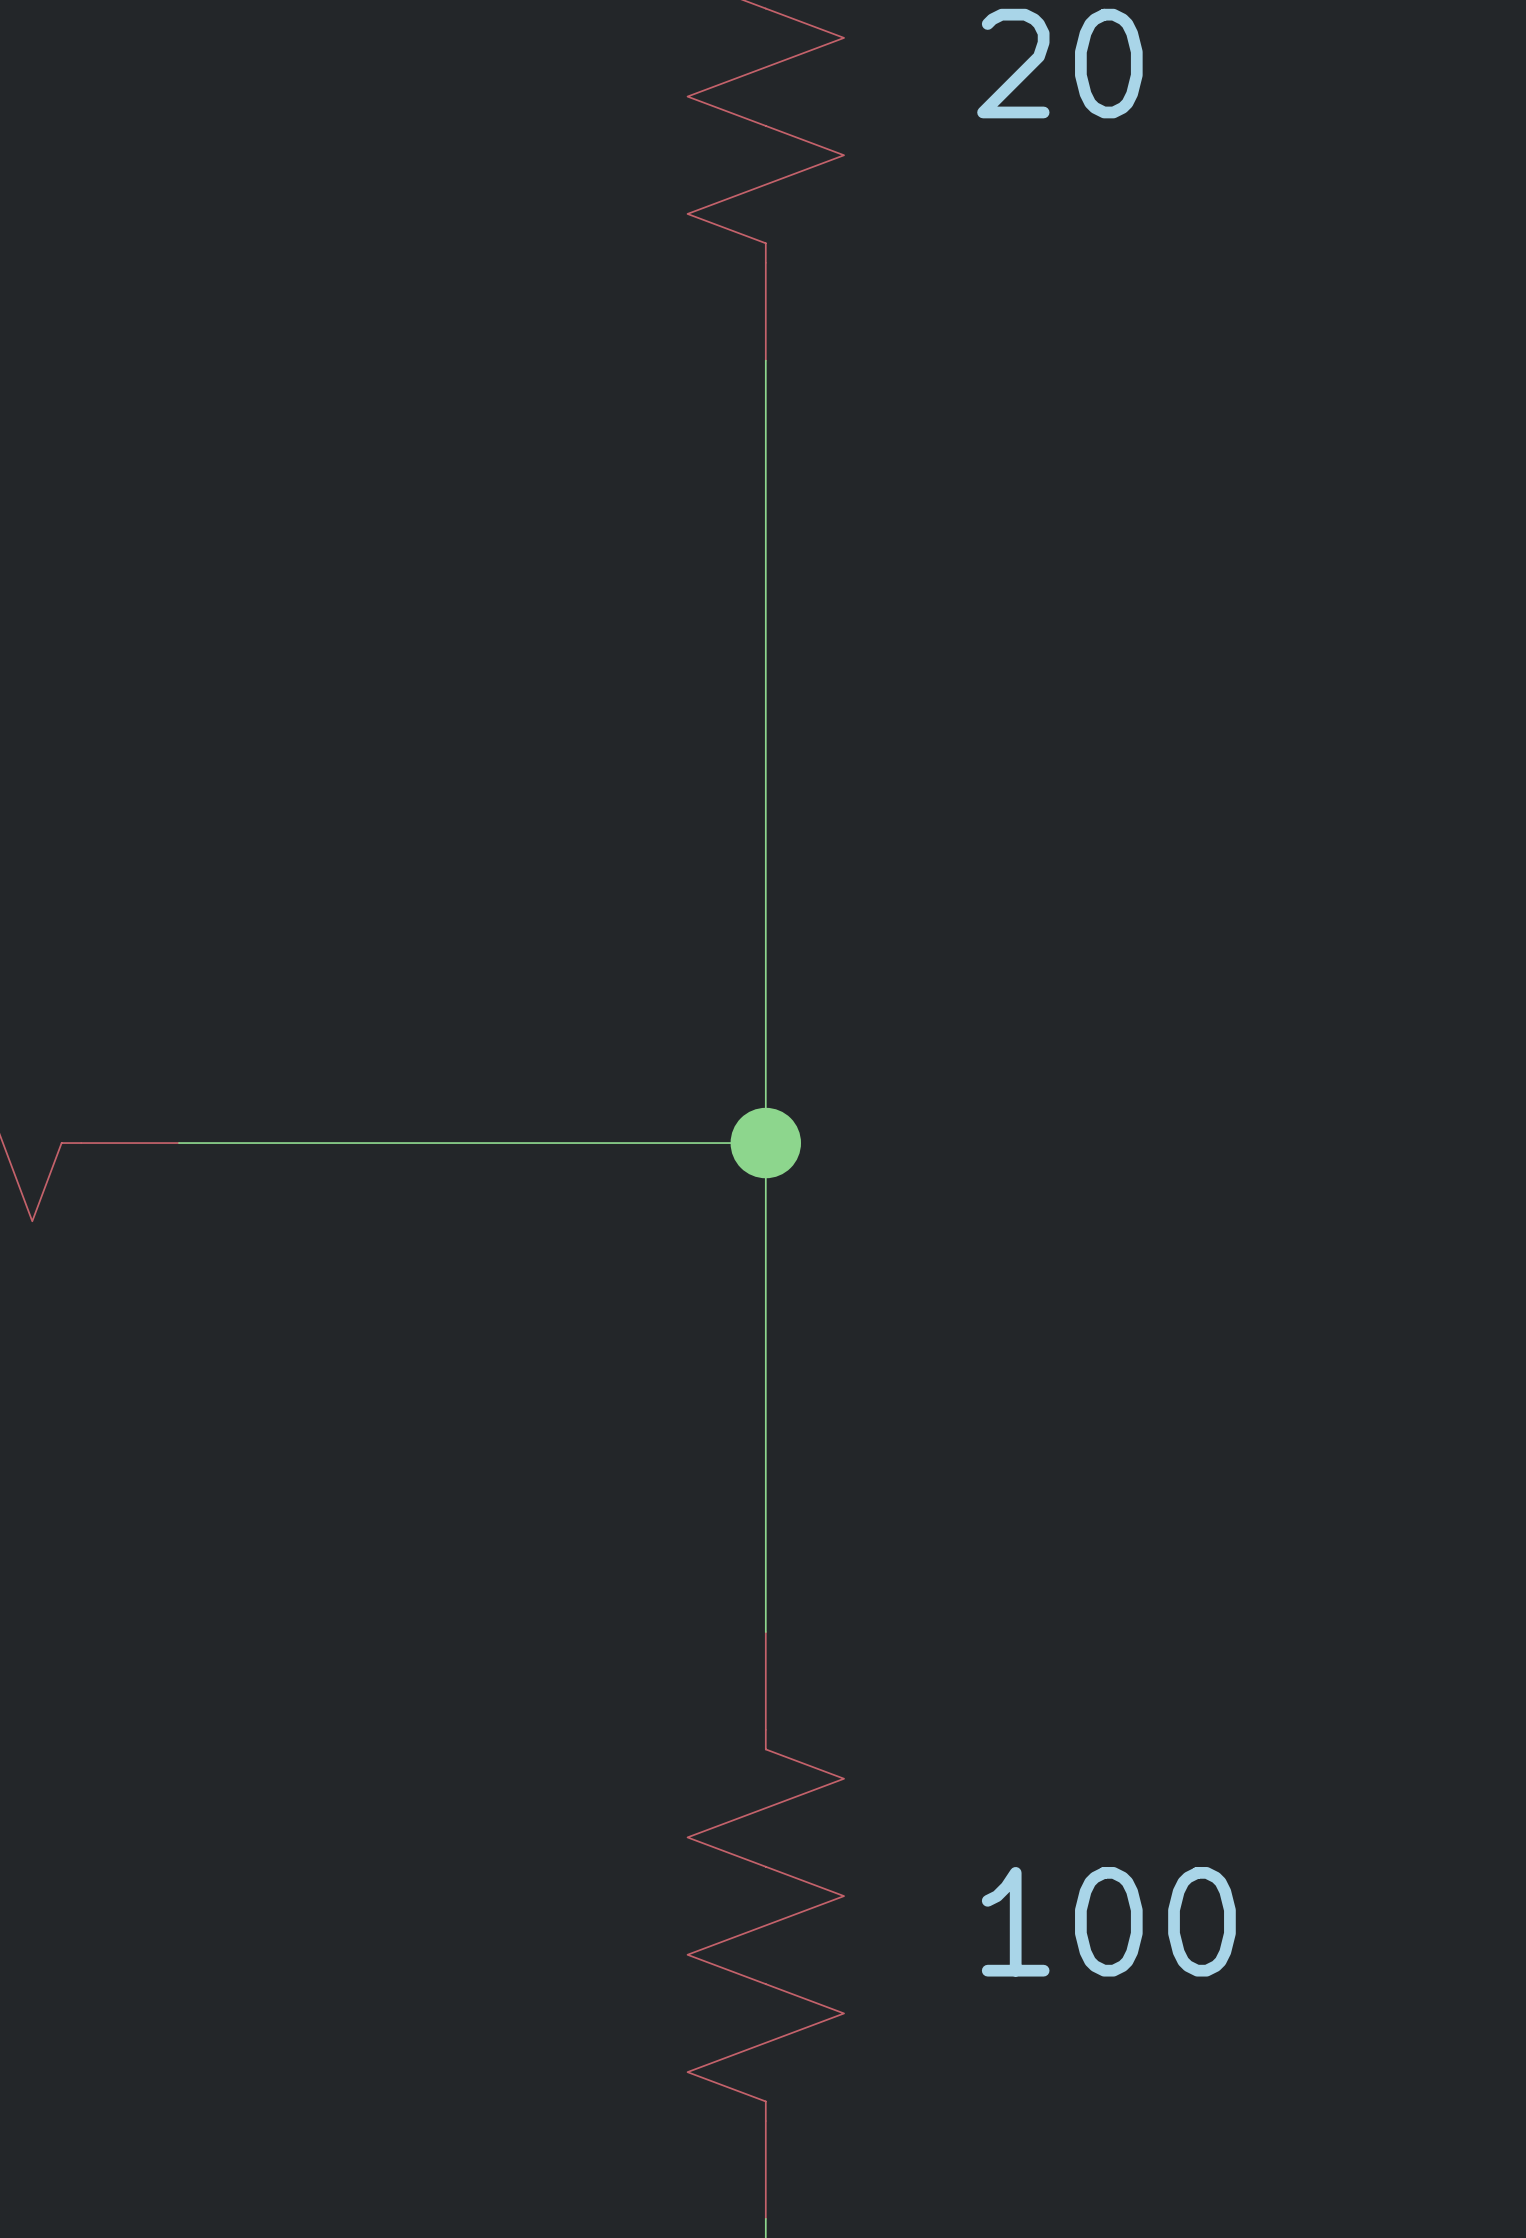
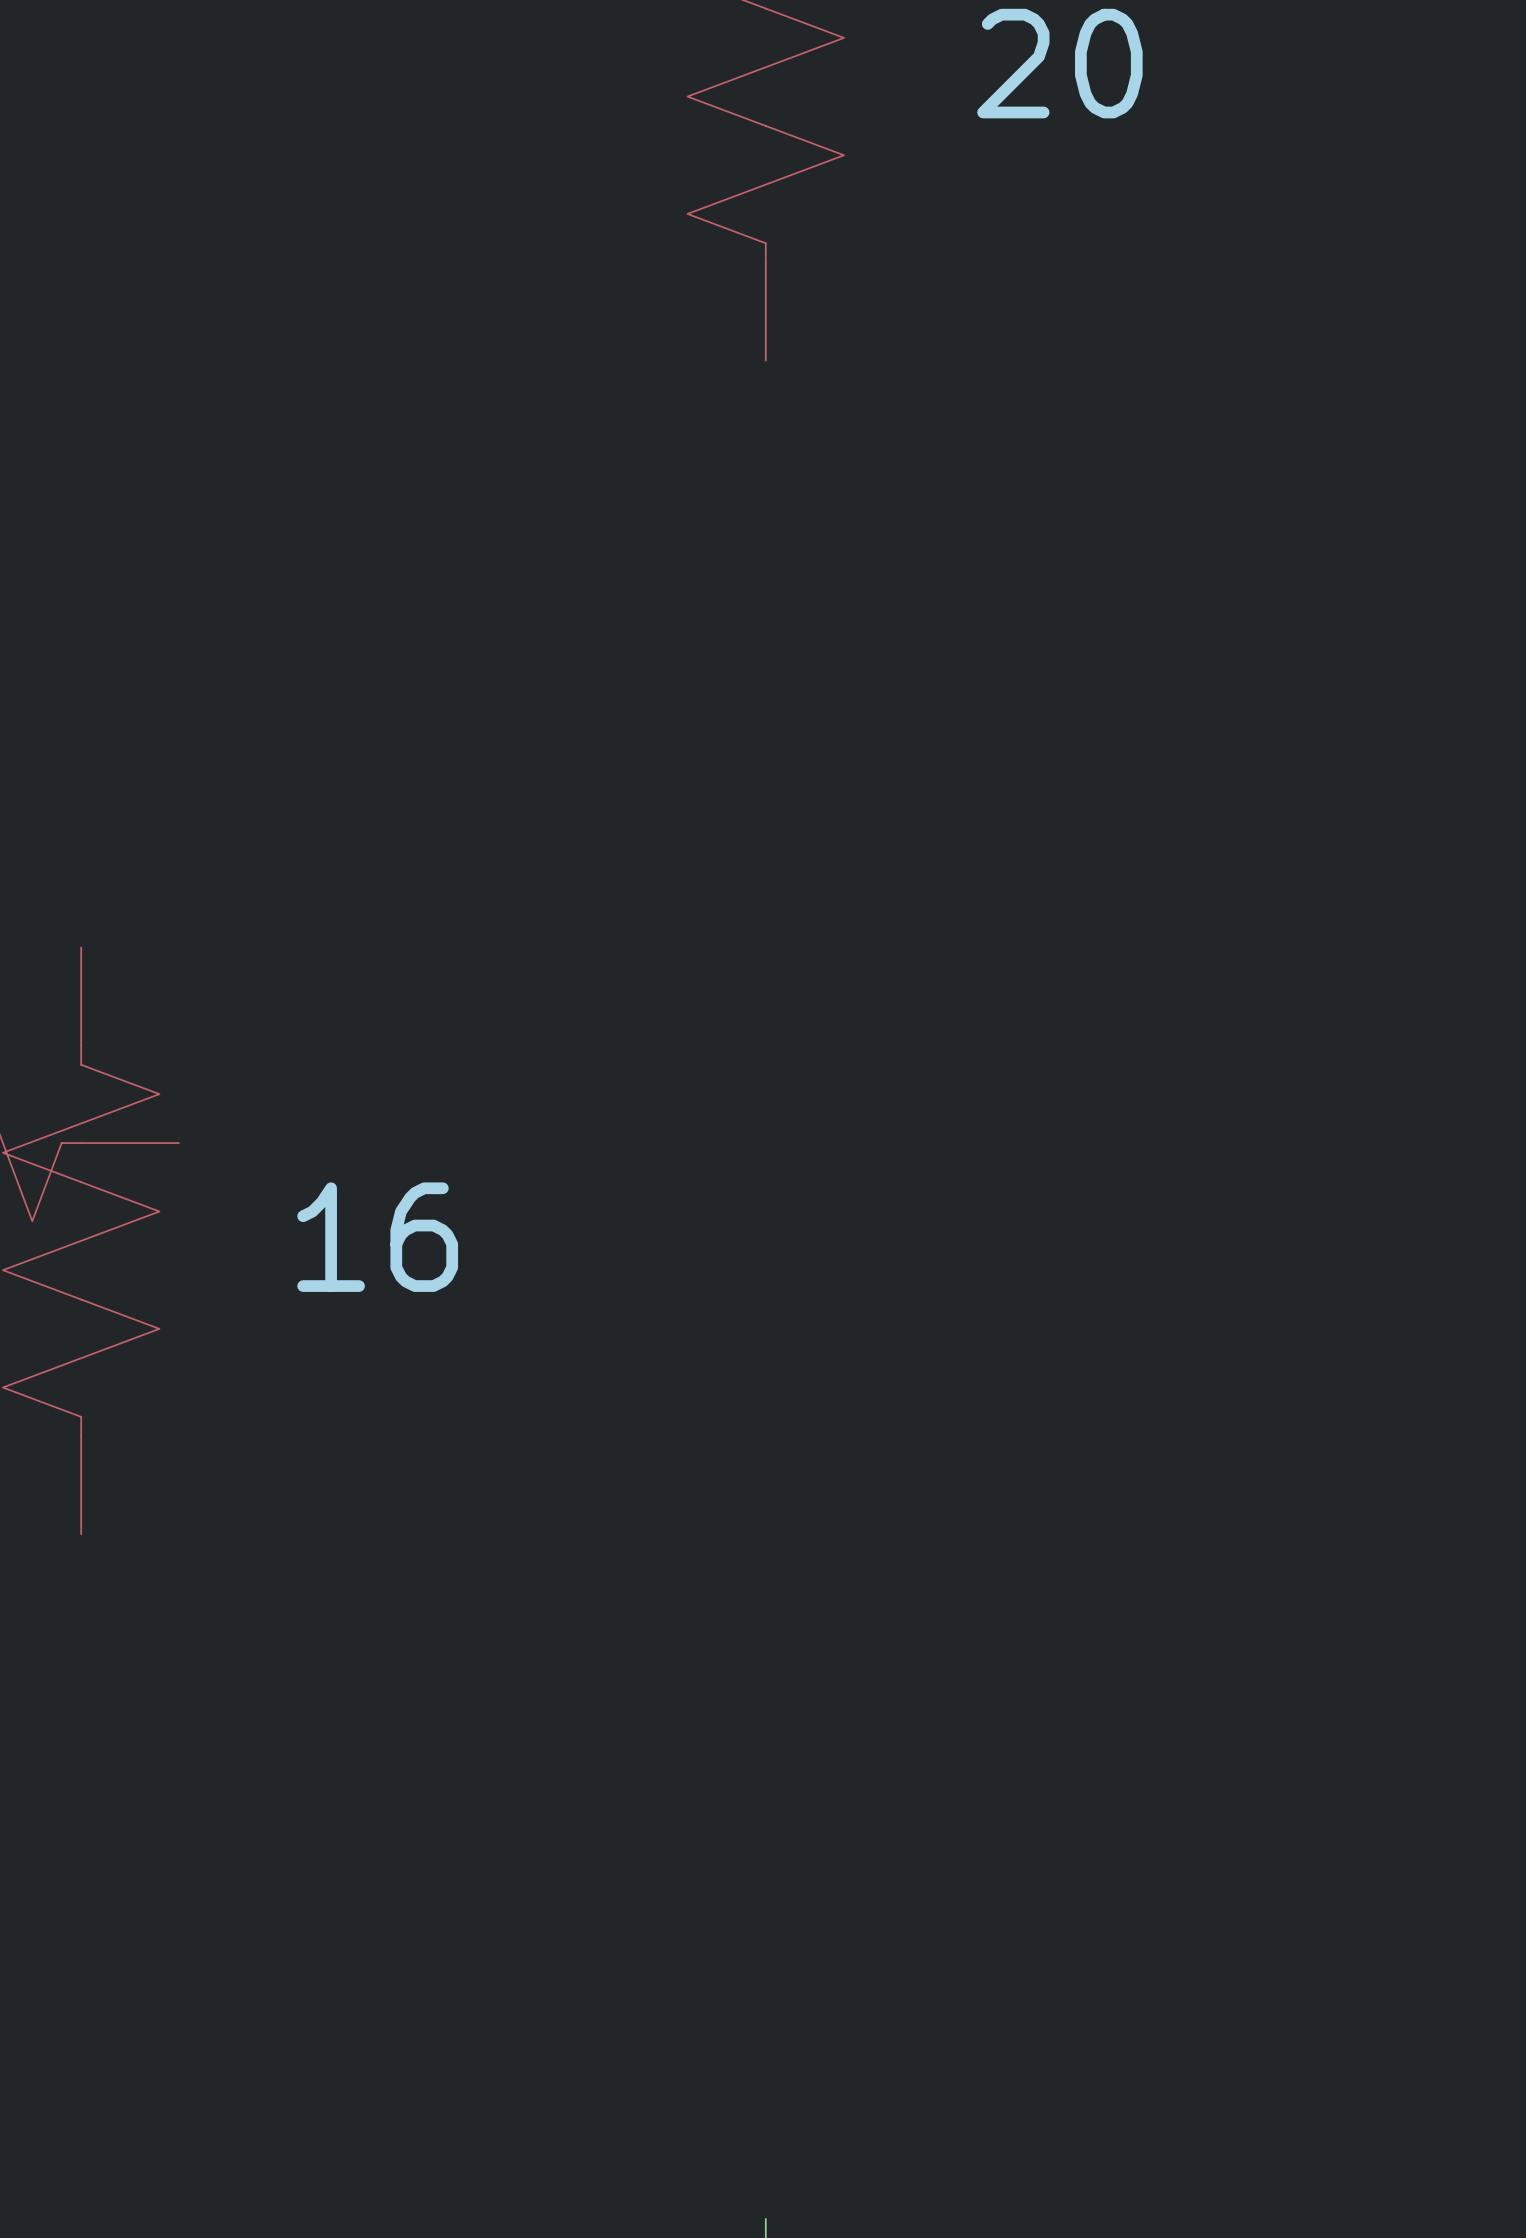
wire: (765, 360) (765, 1632) -> none
wire: (178, 1143) (765, 1143) -> none
junction: (765, 1143) -> none
part: none -> 16 (81, 1240)
part: 100 (765, 1925) -> none

